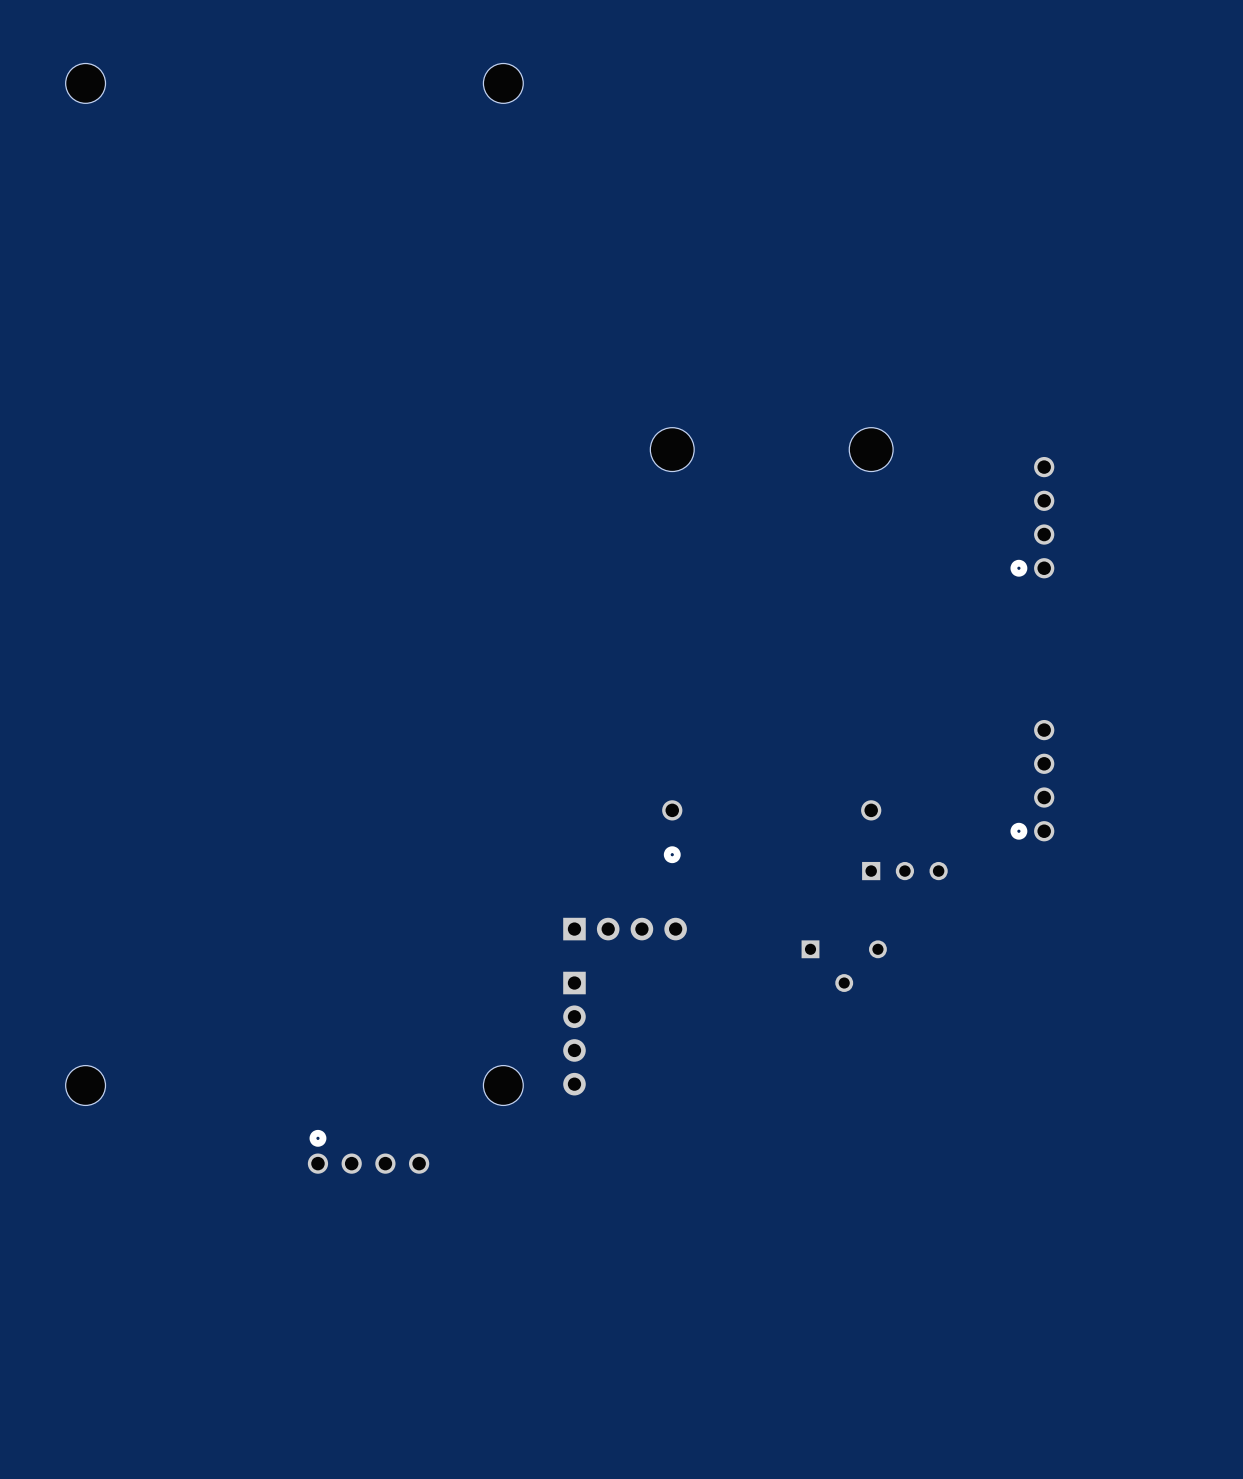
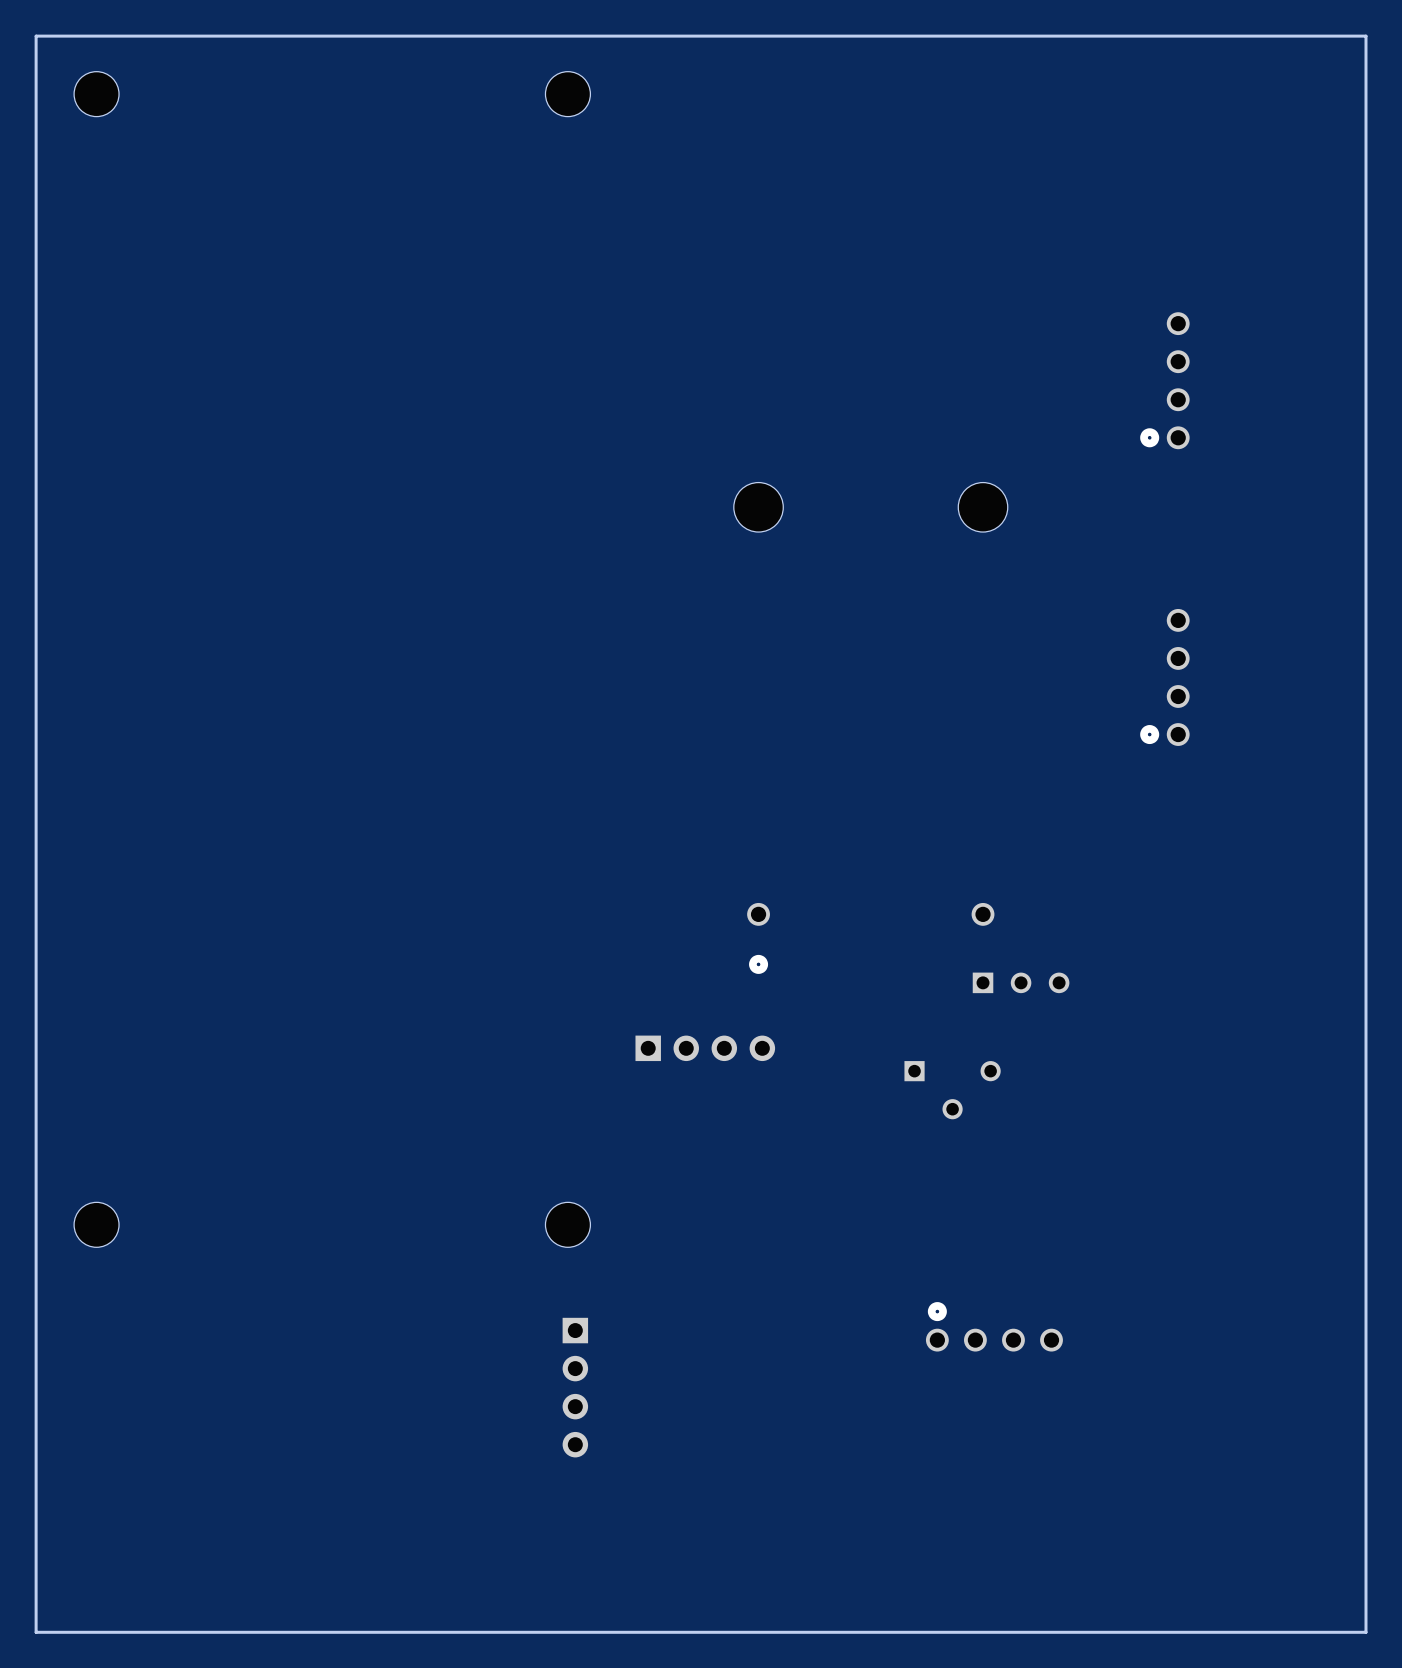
board edge: none -> (1365, 36) (36, 36) (36, 1632) (1365, 1632) (1365, 36)
part: none -> (1164, 380)
part position: (1032, 517) -> (1164, 677)
part: (1032, 780) -> none
part position: (574, 1033) -> (575, 1387)
part: (368, 1151) -> none
part: none -> (994, 1326)

